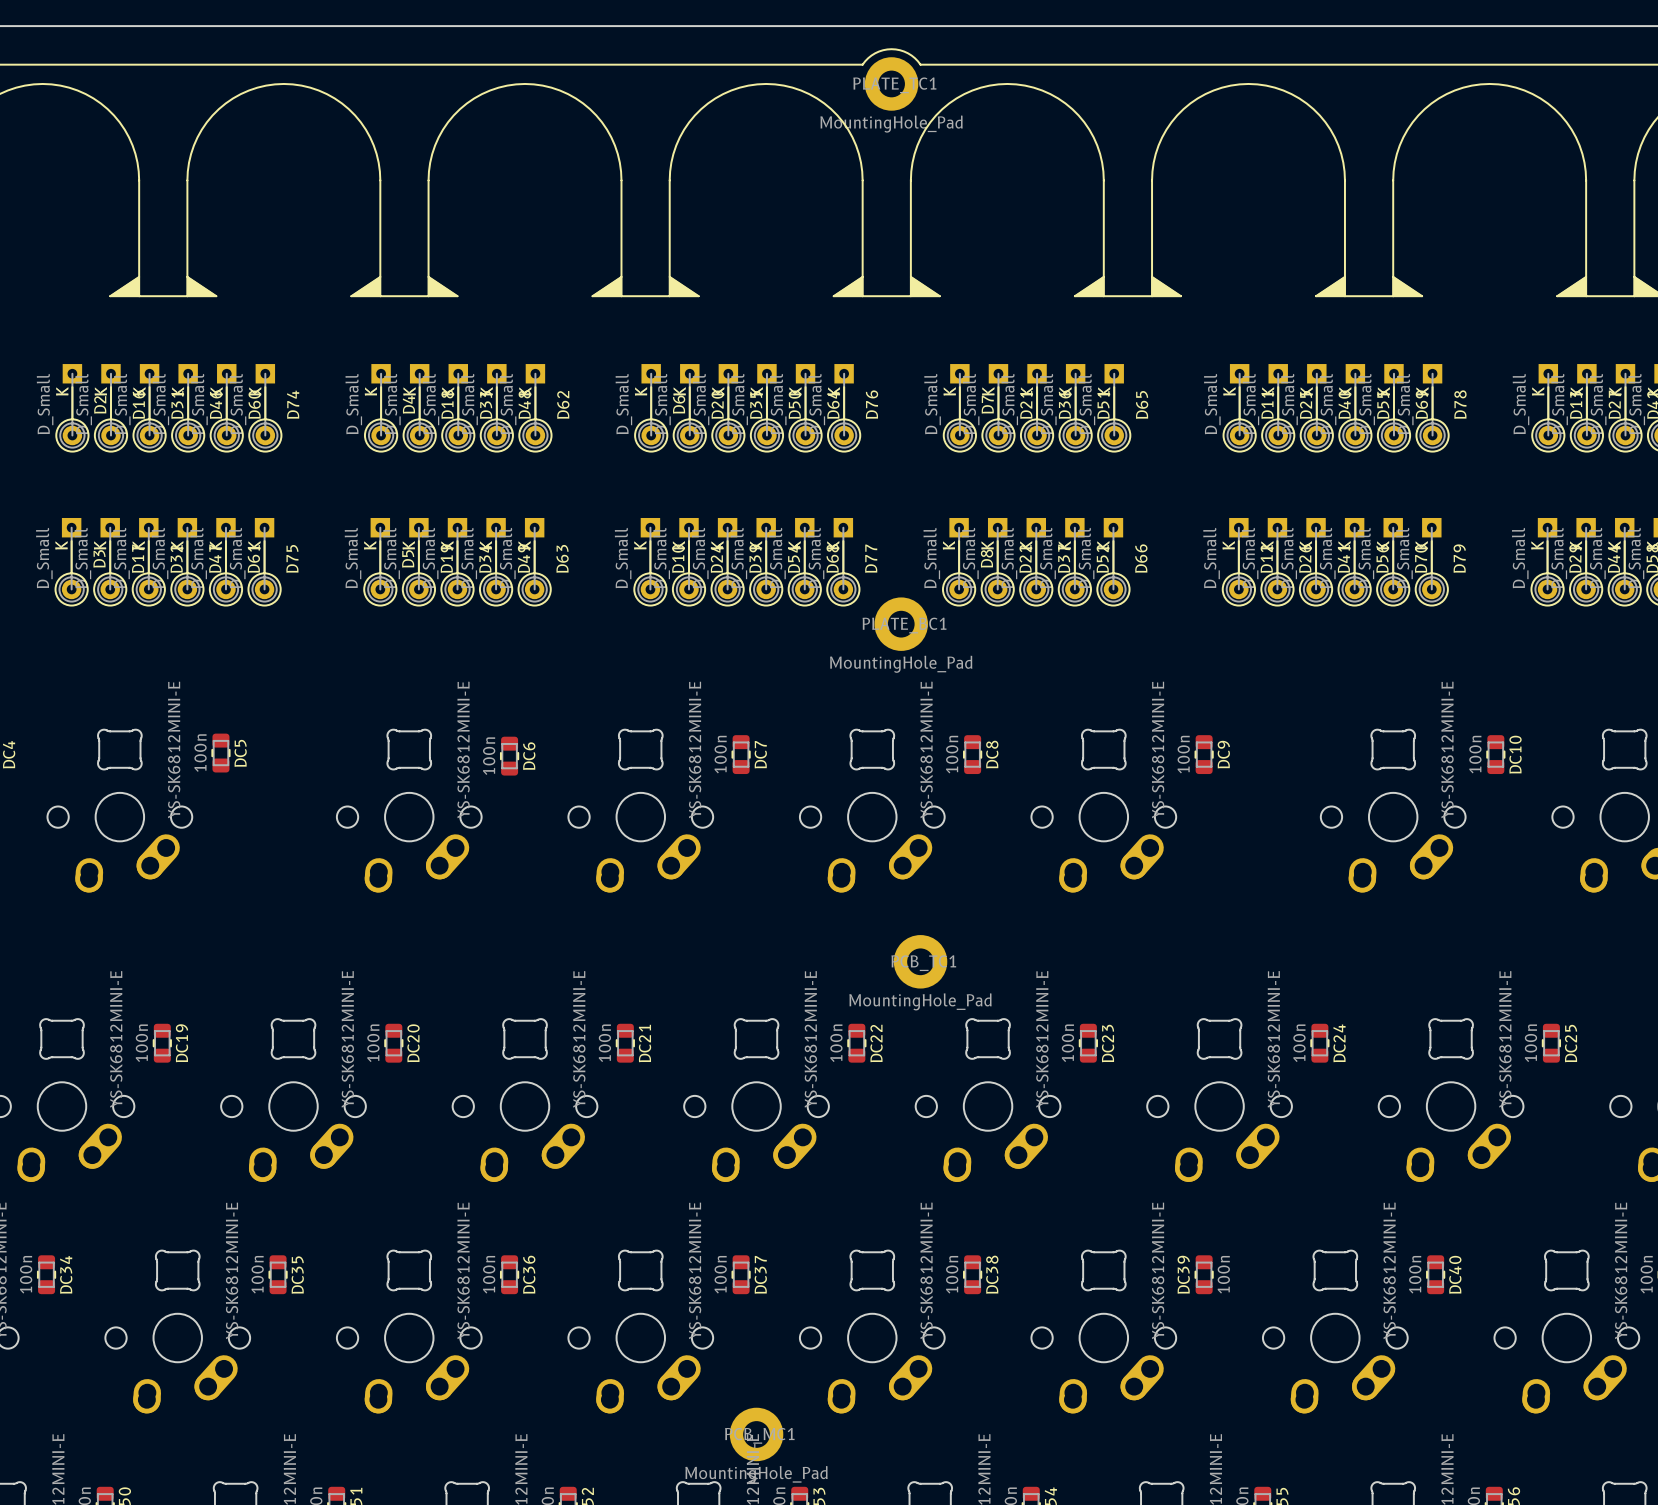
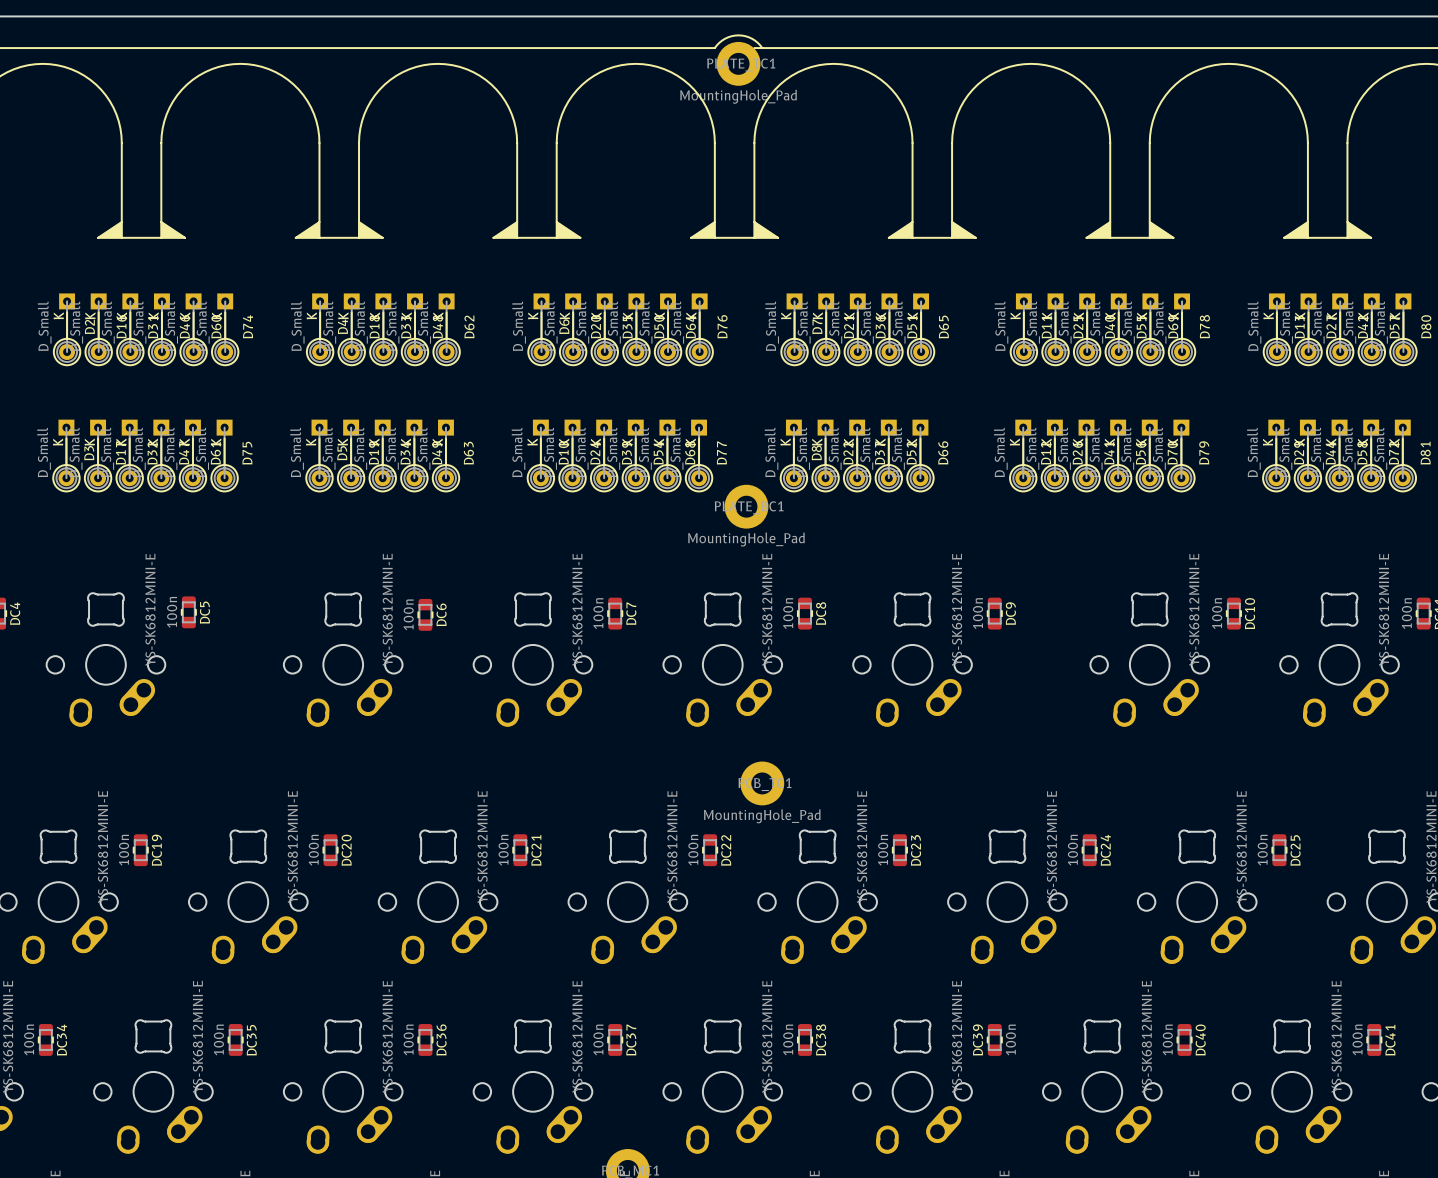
line: none -> (754, 48) (762, 48)

